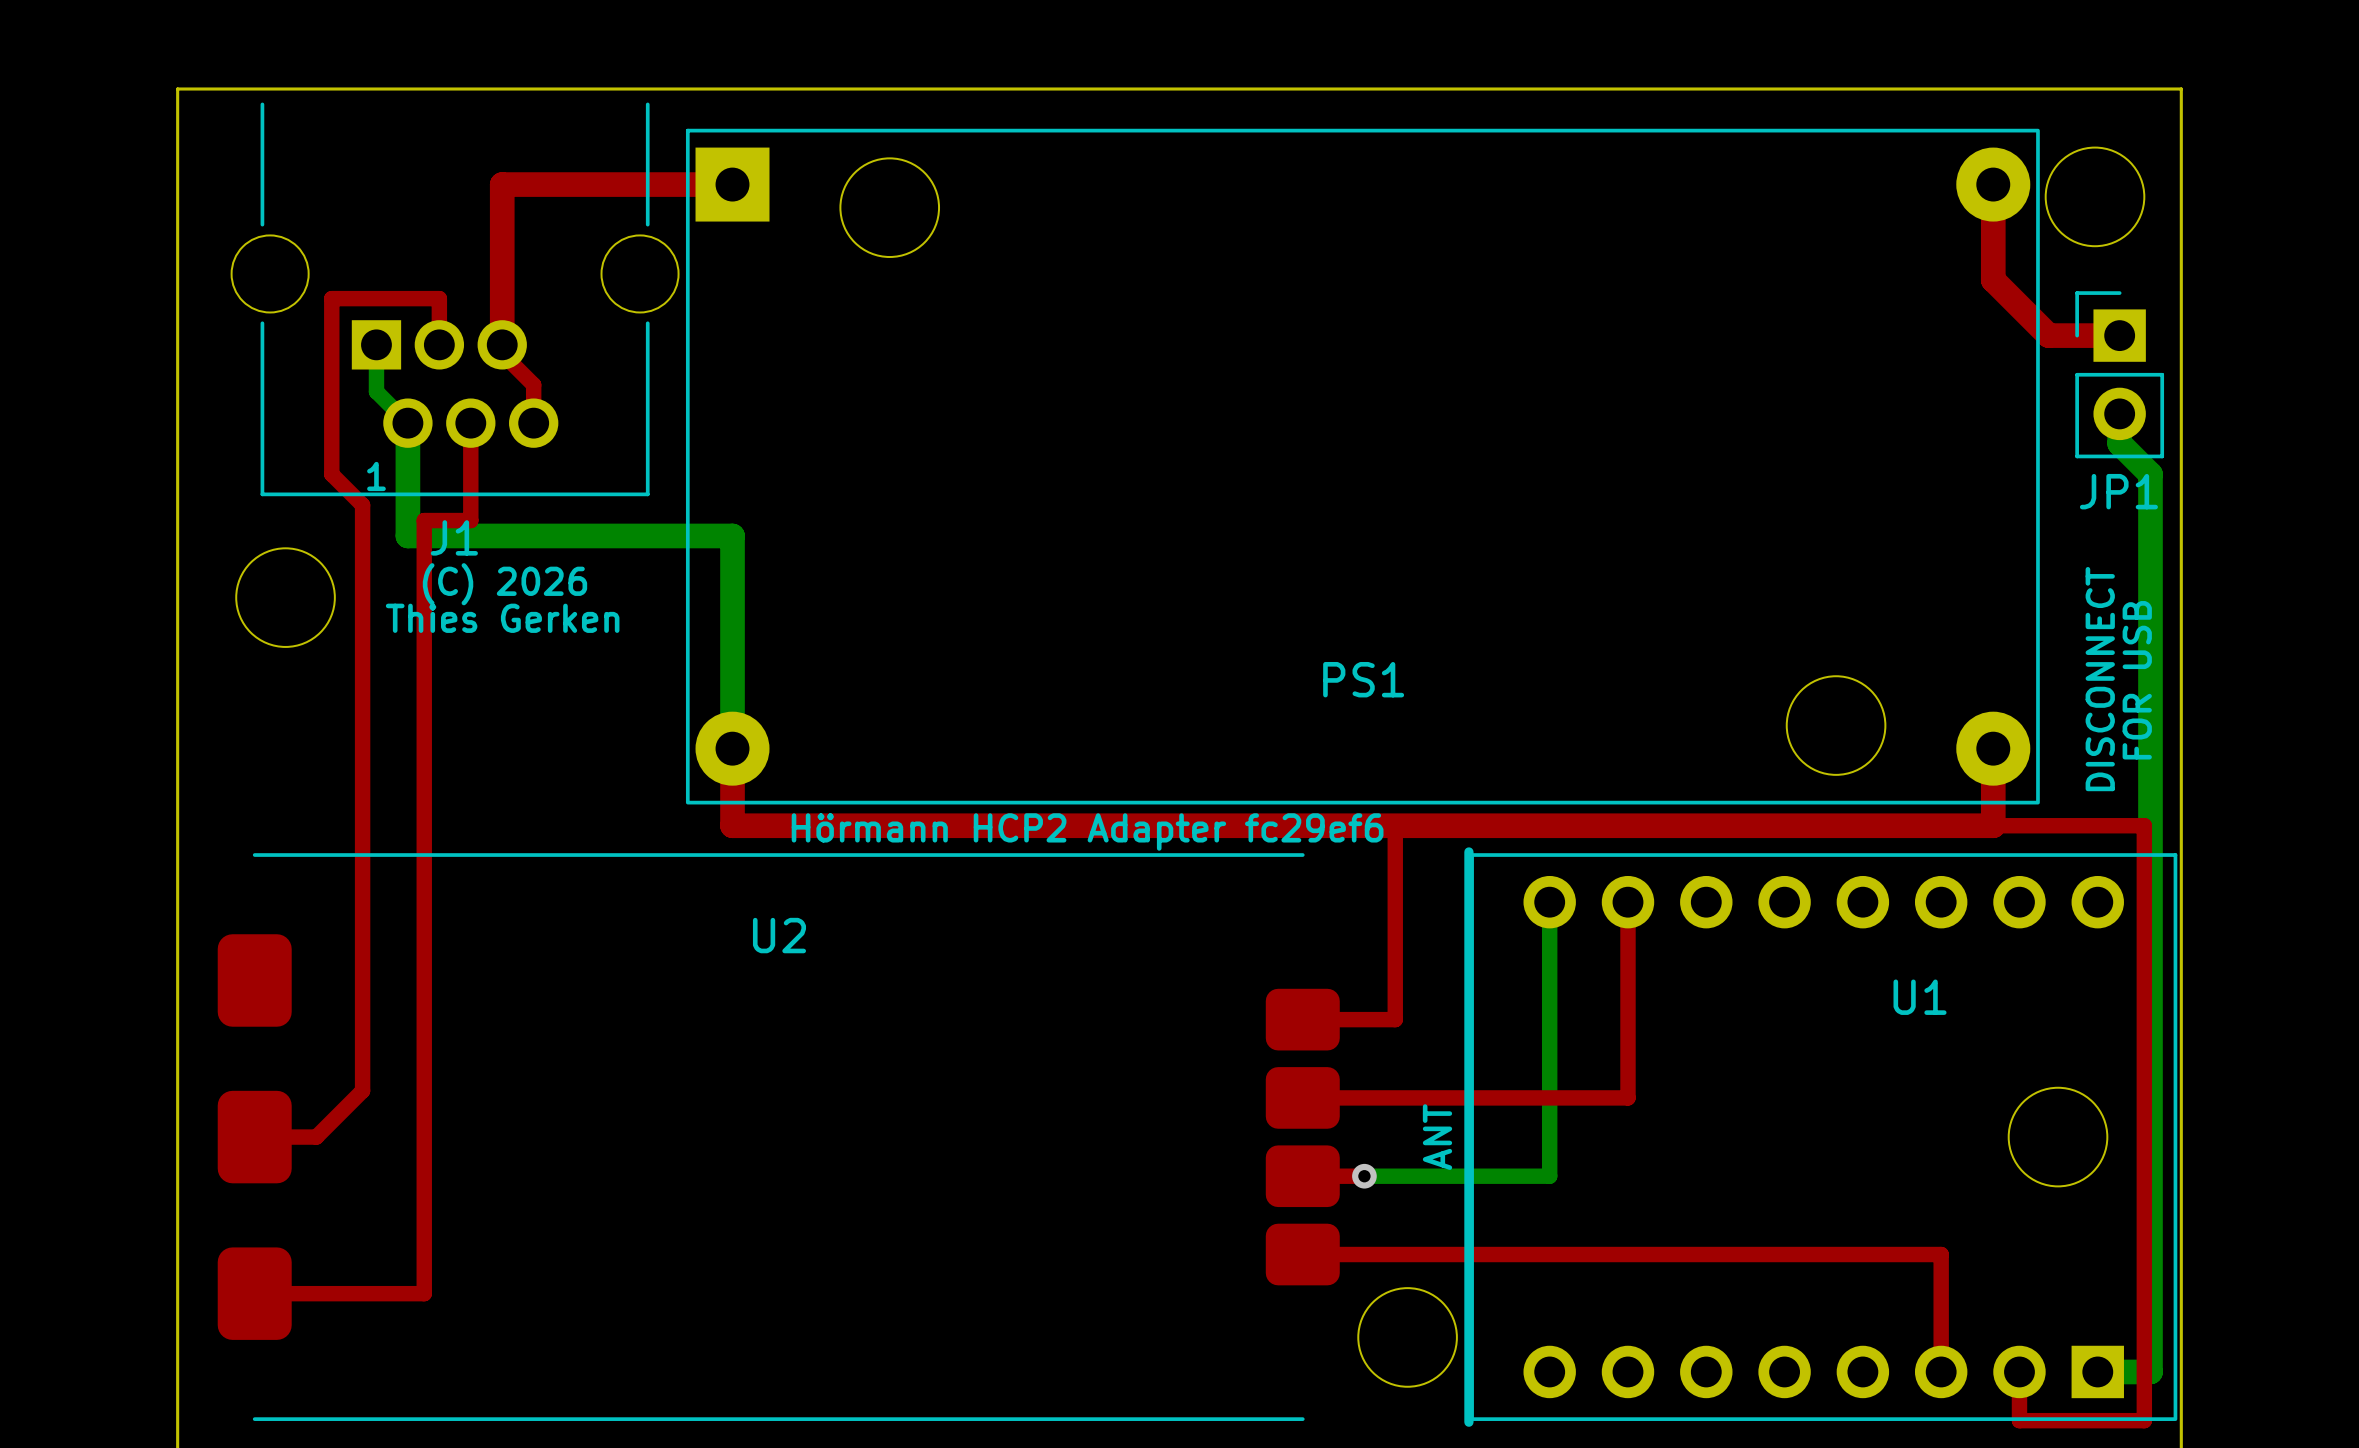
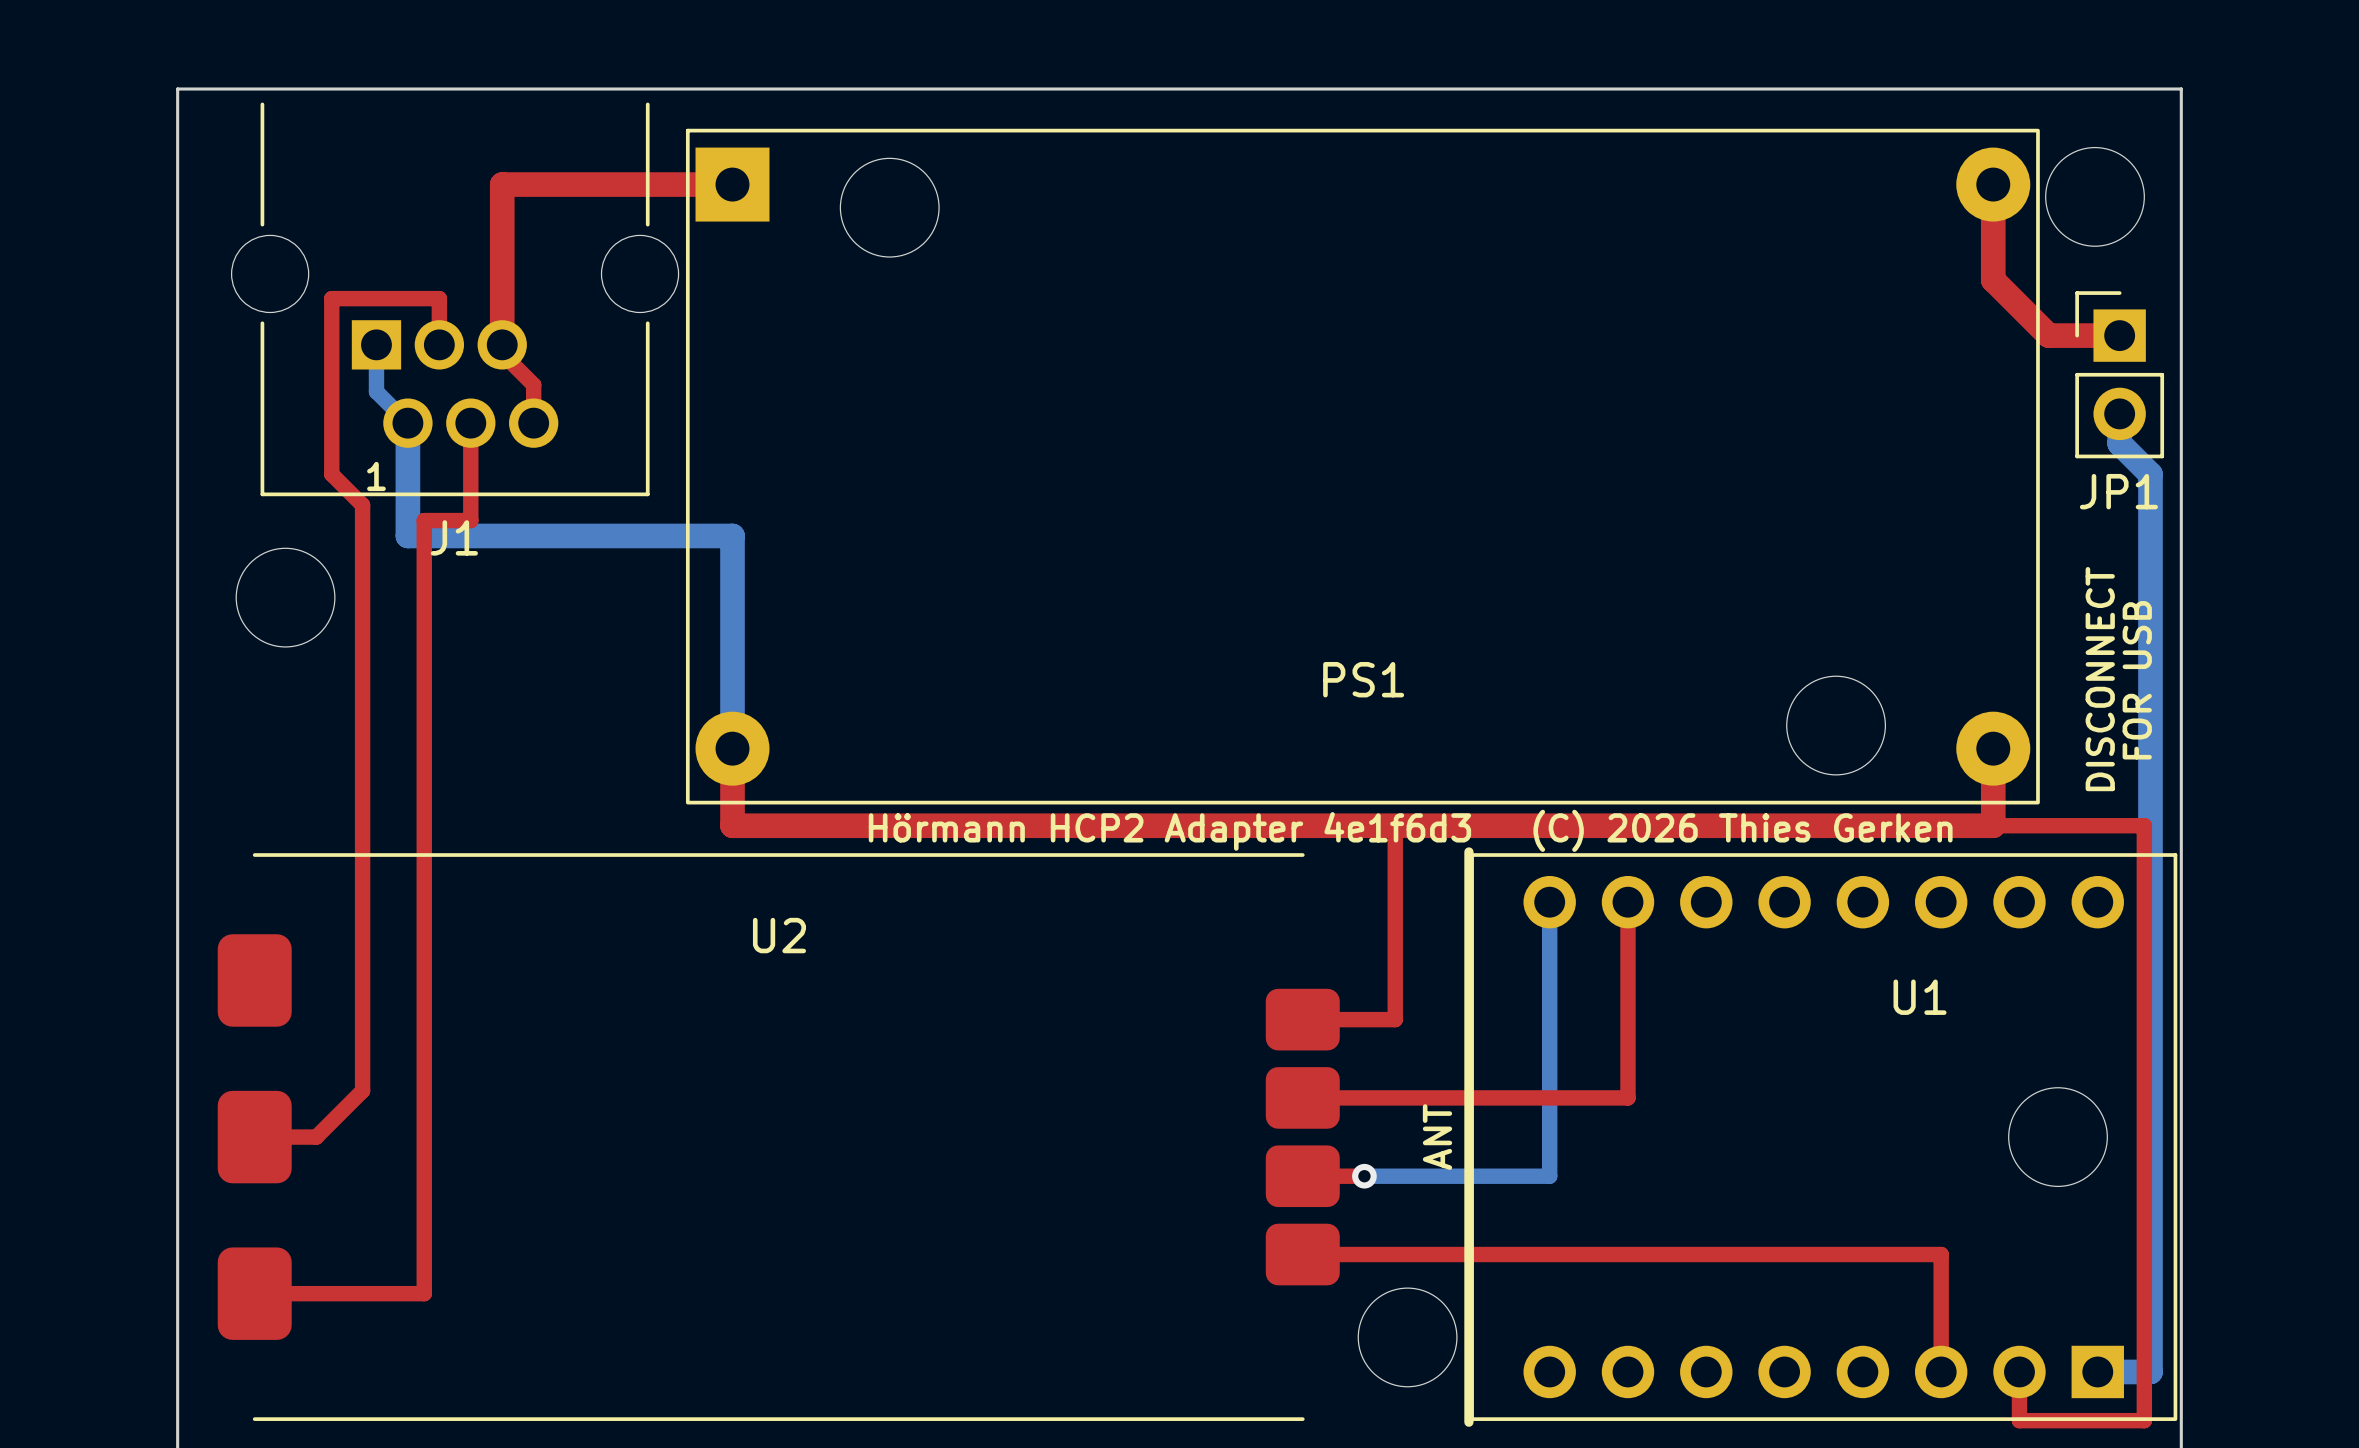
text: (C) 2026 (504, 584) -> none
text: Thies Gerken (502, 618) -> none
text: none -> Hörmann HCP2 Adapter 4e1f6d3 (C) 2026 Thies Gerken (1410, 830)
text: Hörmann HCP2 Adapter fc29ef6 (1087, 832) -> none

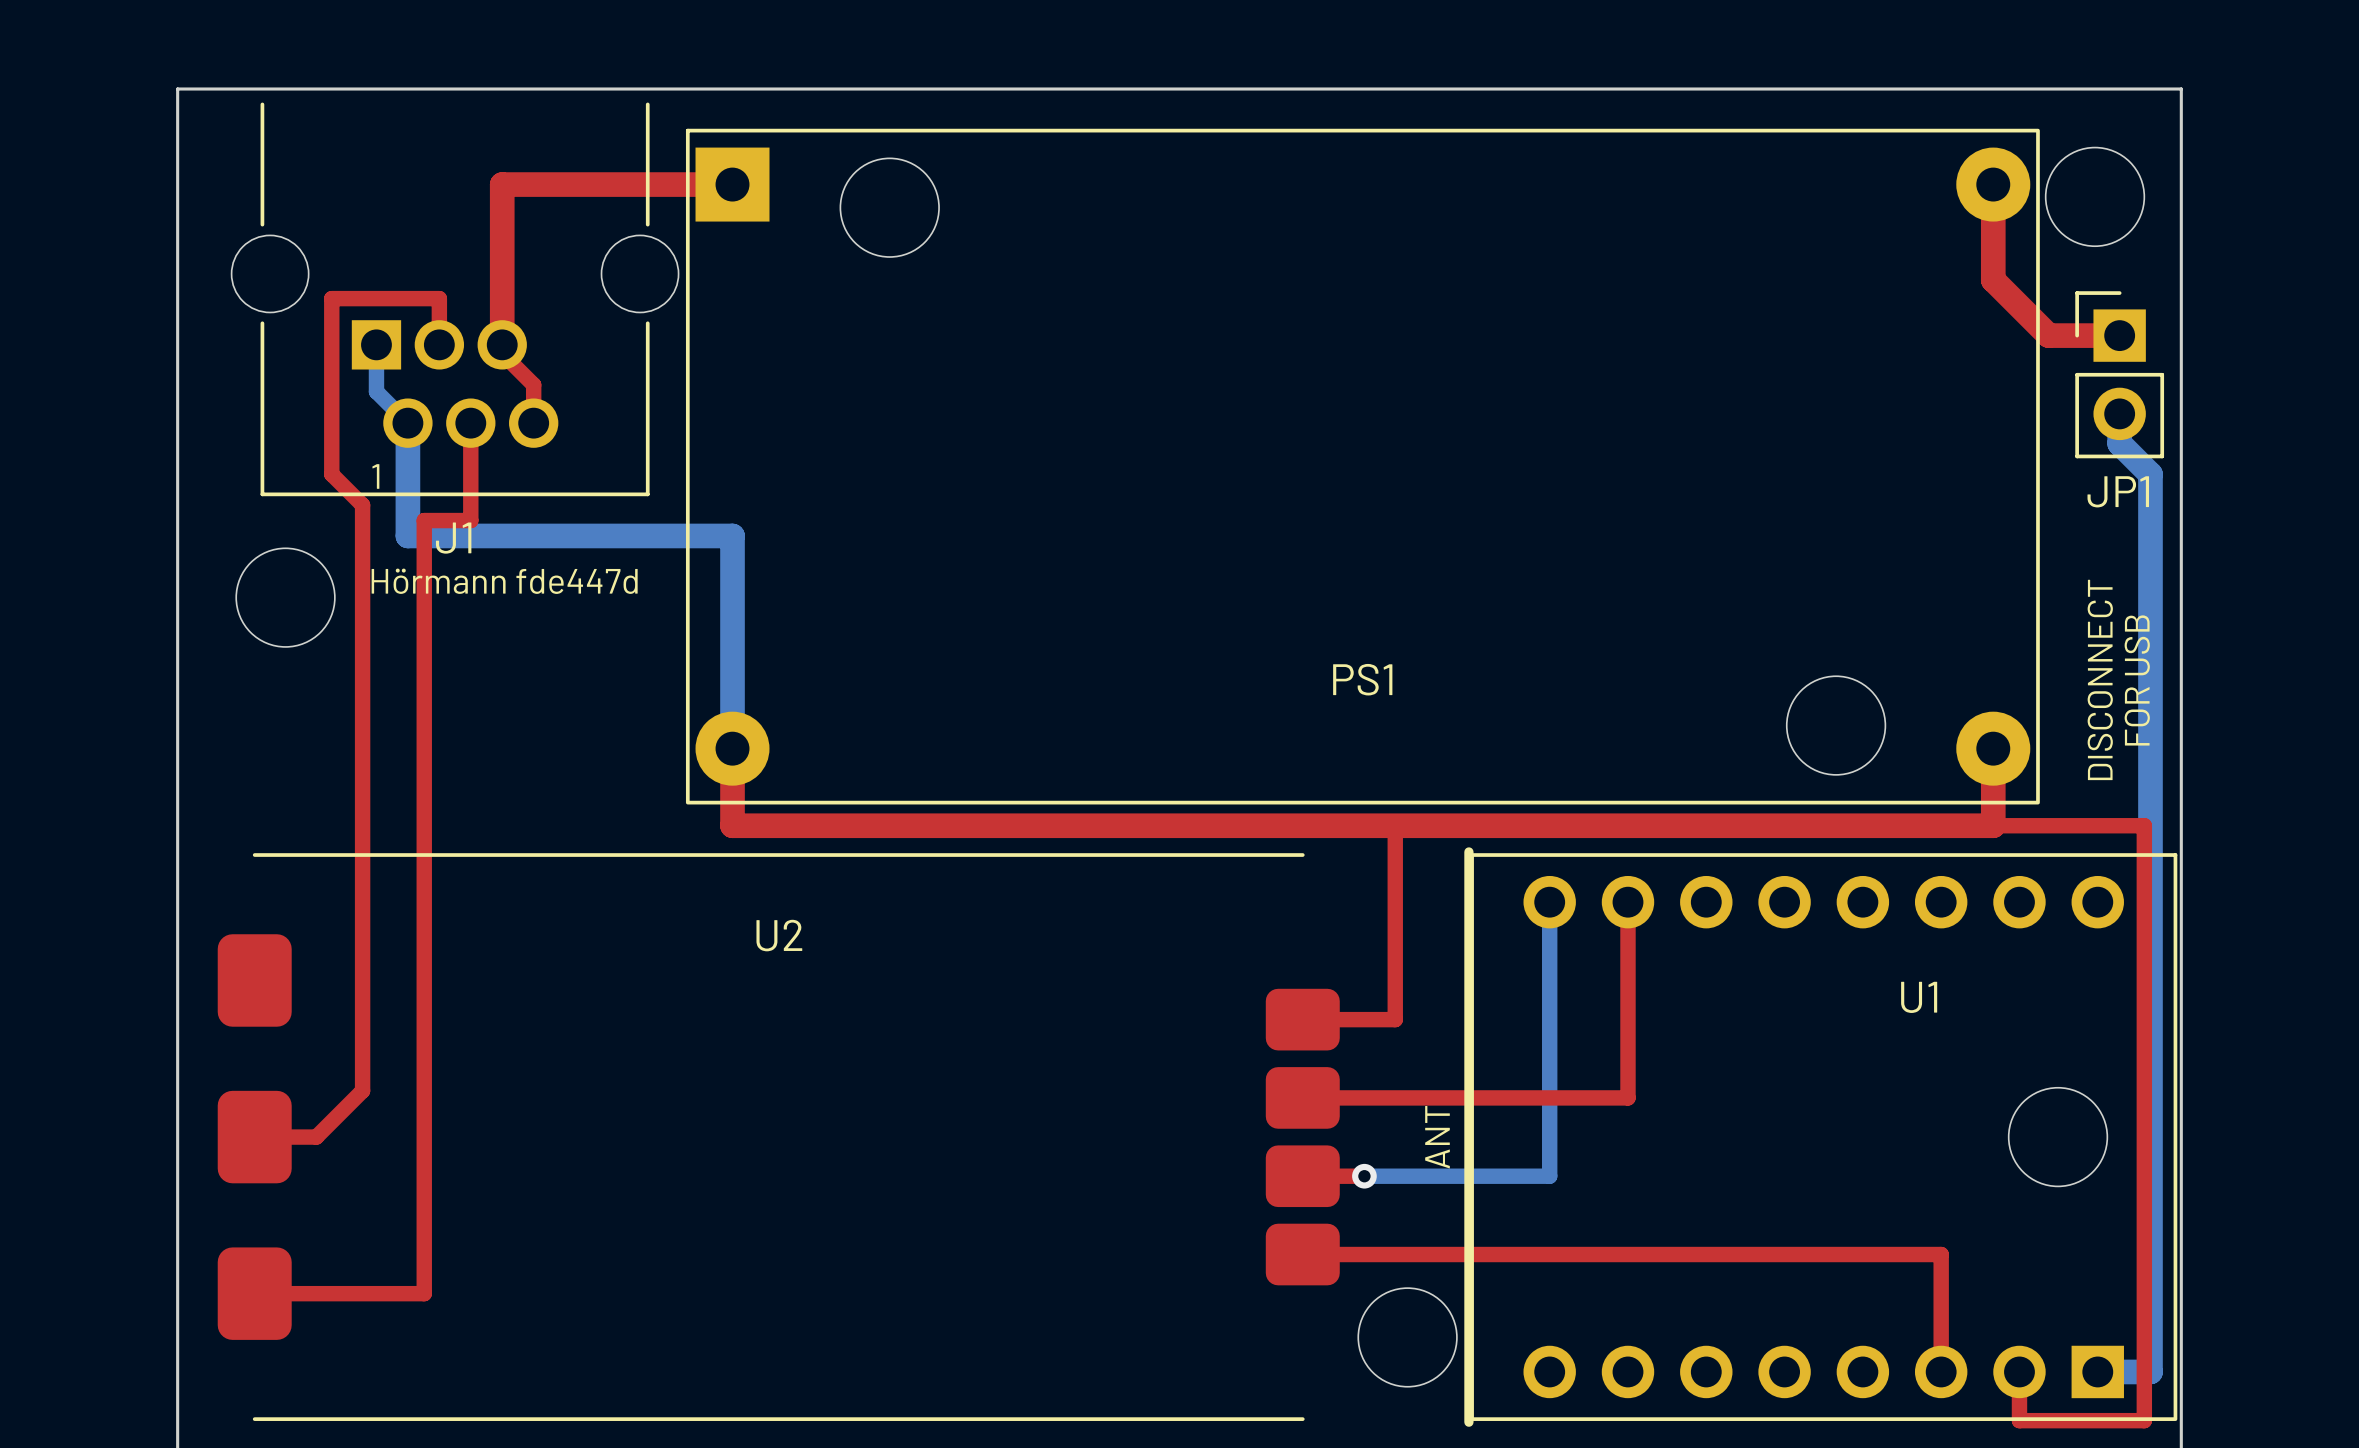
text: none -> Hörmann fde447d (504, 581)
text: Hörmann HCP2 Adapter 4e1f6d3 (C) 2026 Thies Gerken (1410, 830) -> none

